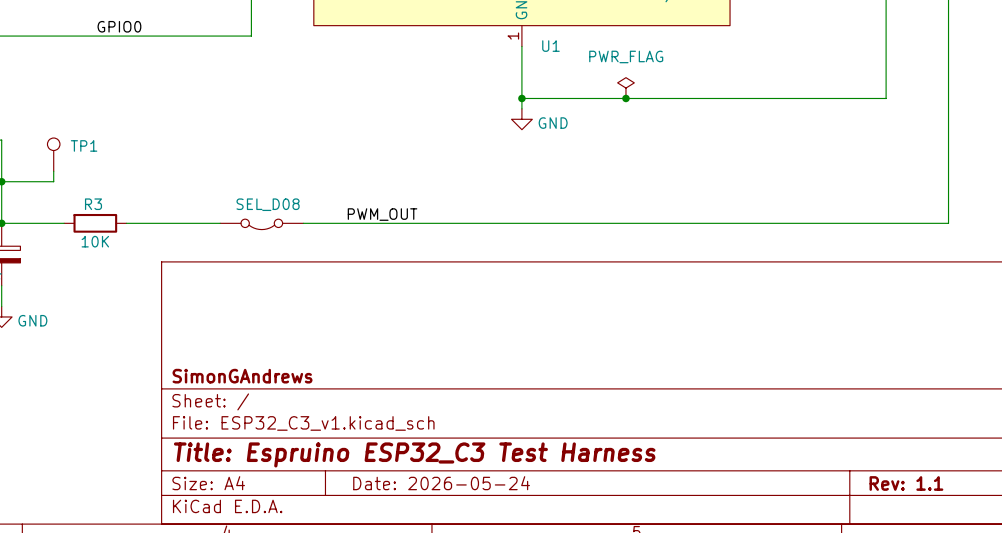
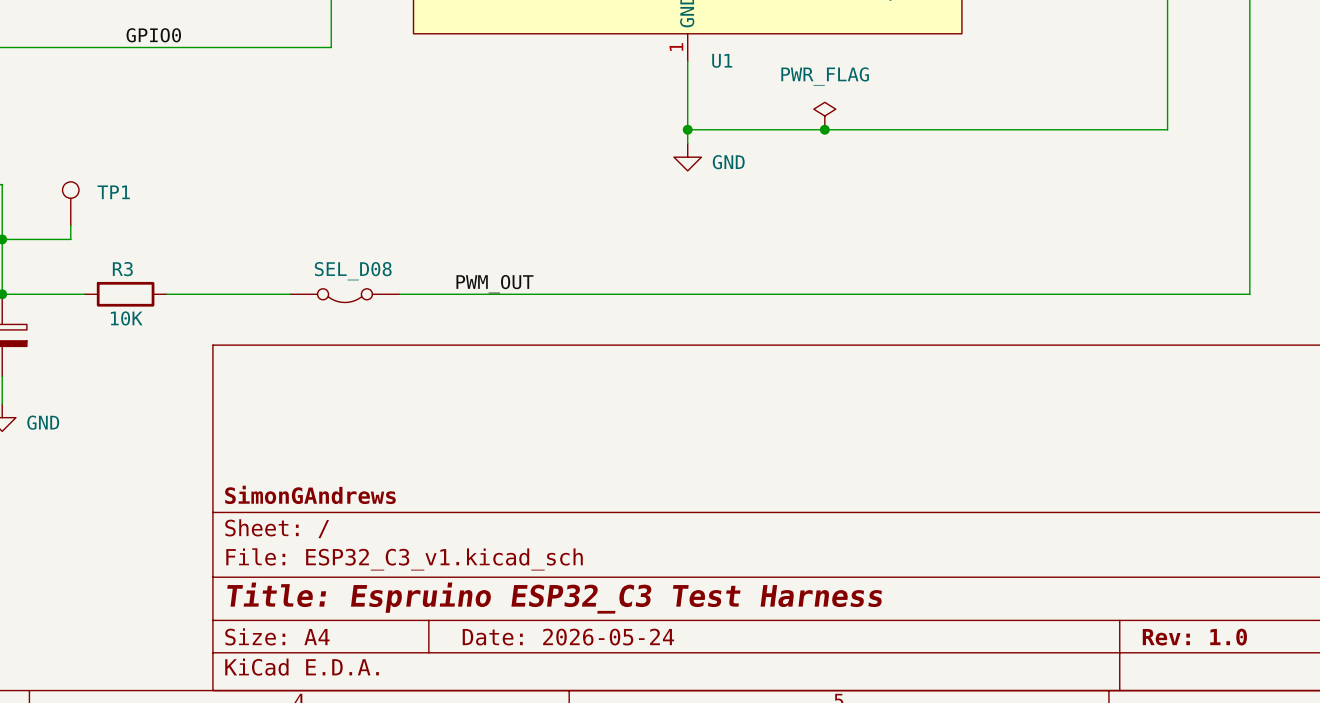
title block: Rev: 1.1 (906, 483) -> Rev: 1.0 (1194, 637)

